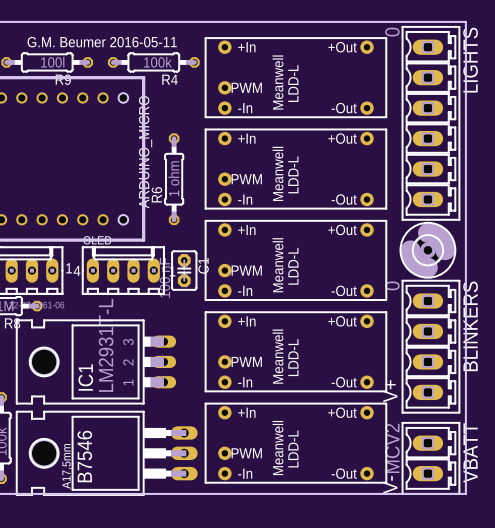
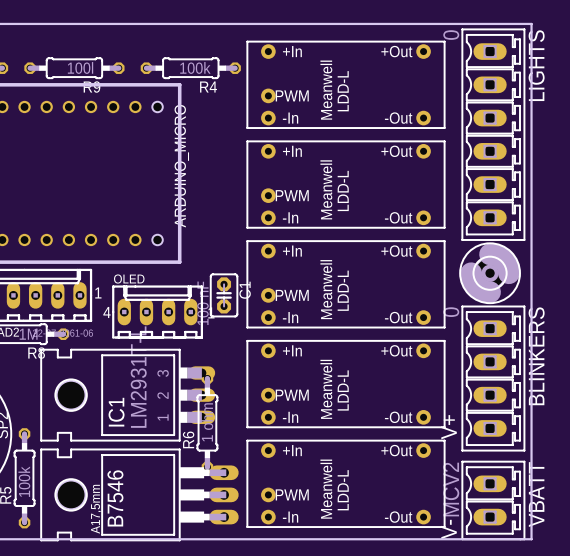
text: G.M. Beumer 2016-05-11 (102, 42) -> none
R6 position: (174, 179) -> (207, 422)
OLED position: (123, 270) -> (157, 312)

